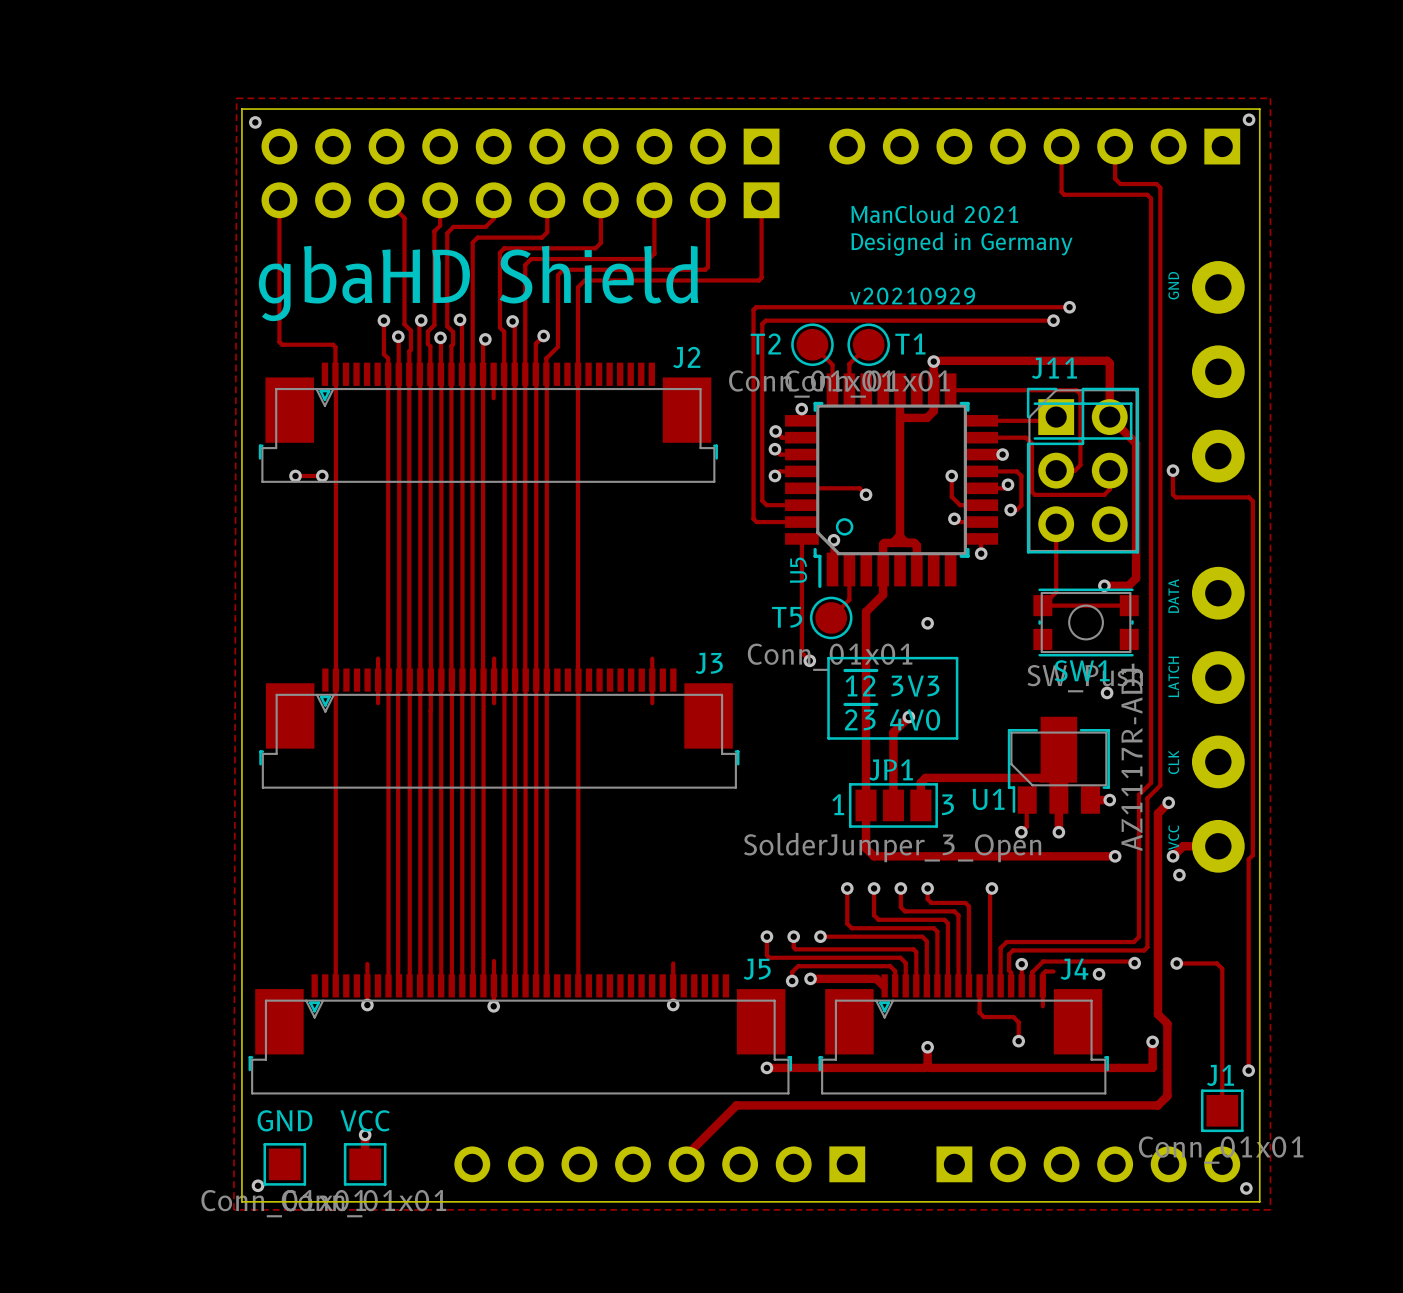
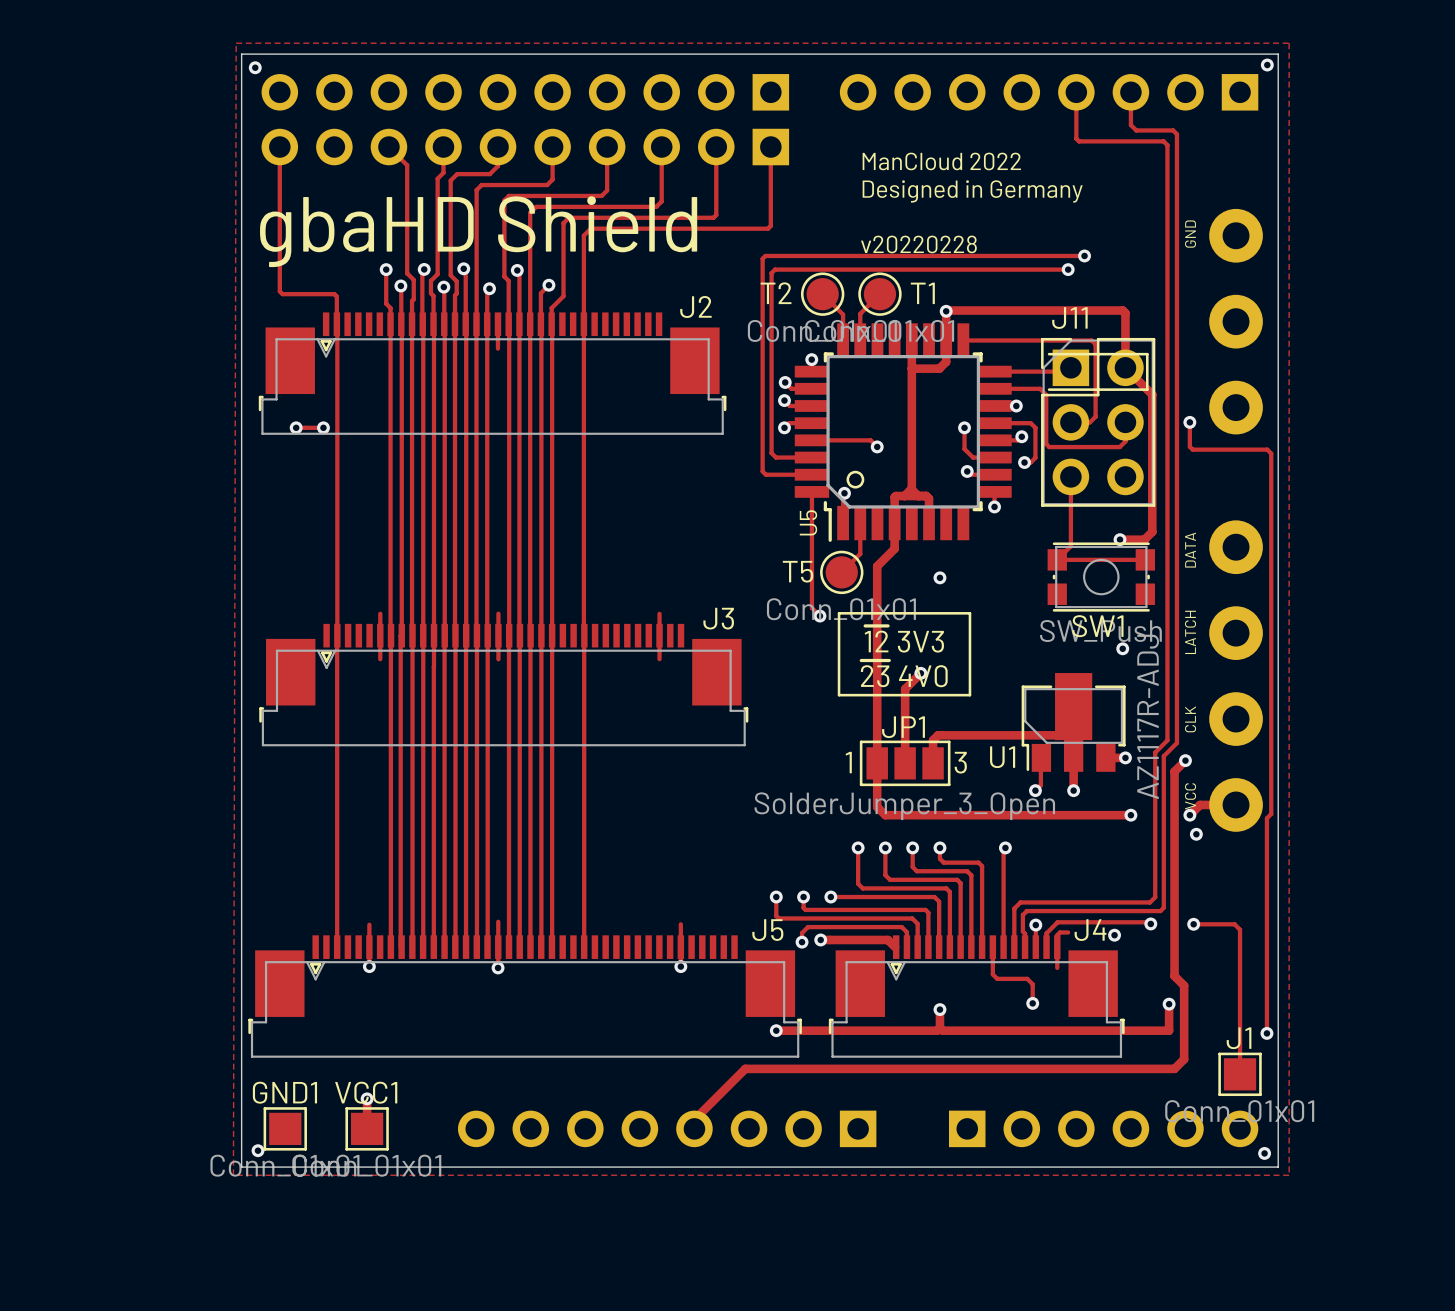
text: ManCloud 2021 (934, 213) -> ManCloud 2022 (941, 161)
text: v20210929 (912, 296) -> v20220228 (918, 244)
GND name: GND (285, 1120) -> GND1 (284, 1092)
VCC name: VCC (365, 1120) -> VCC1 (366, 1092)

